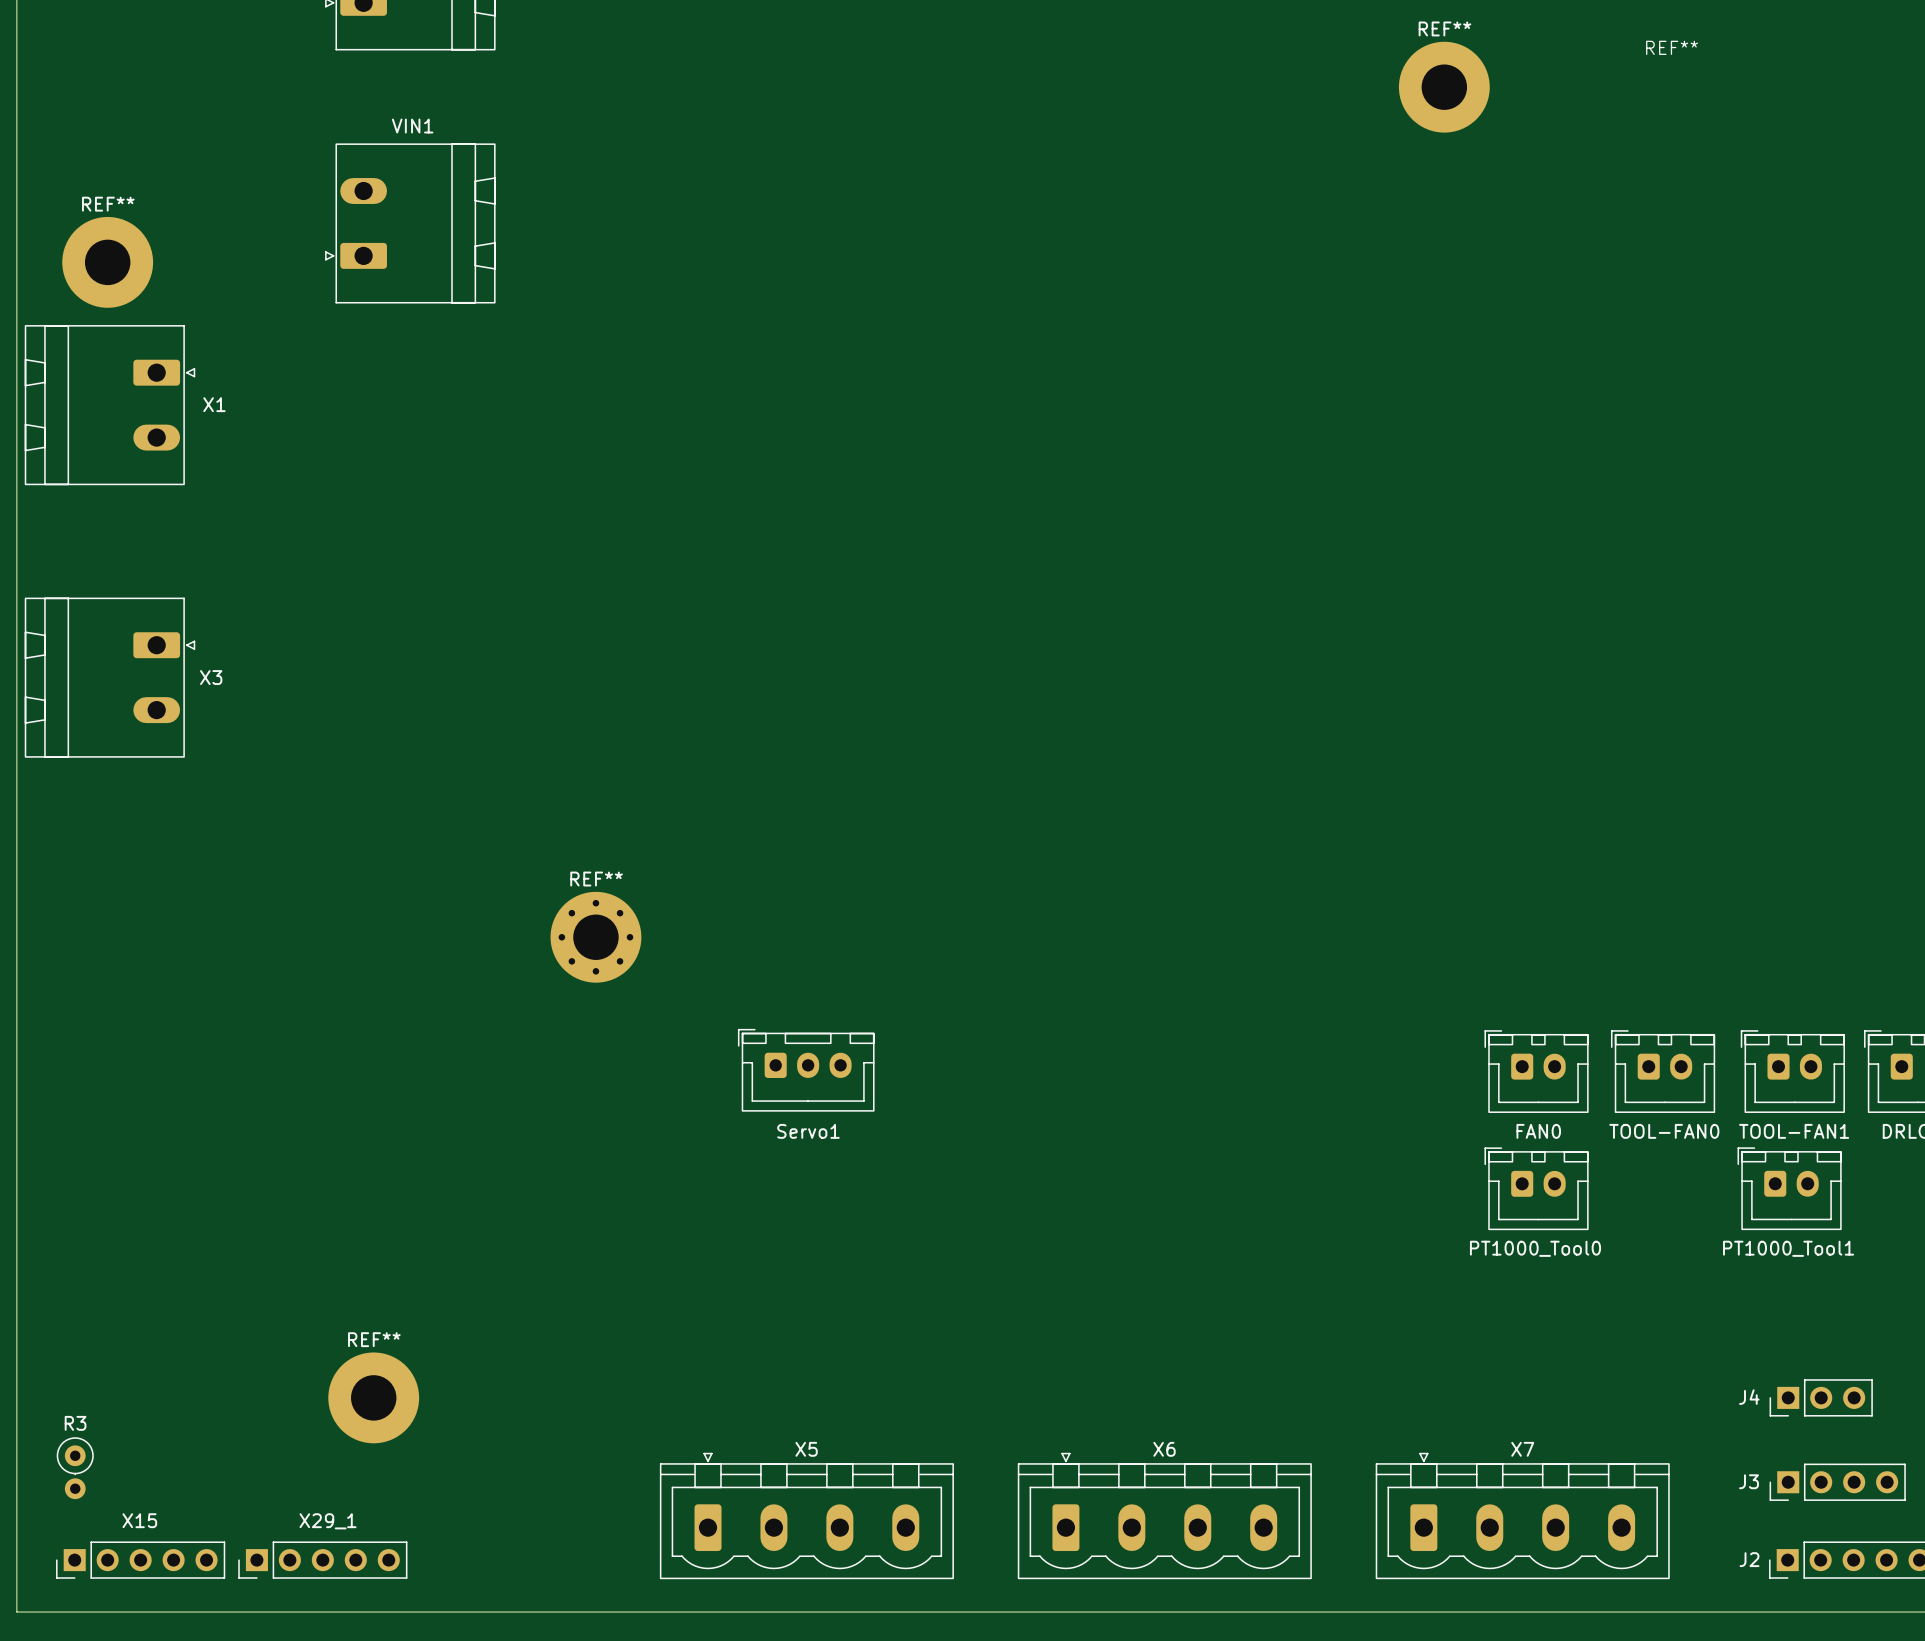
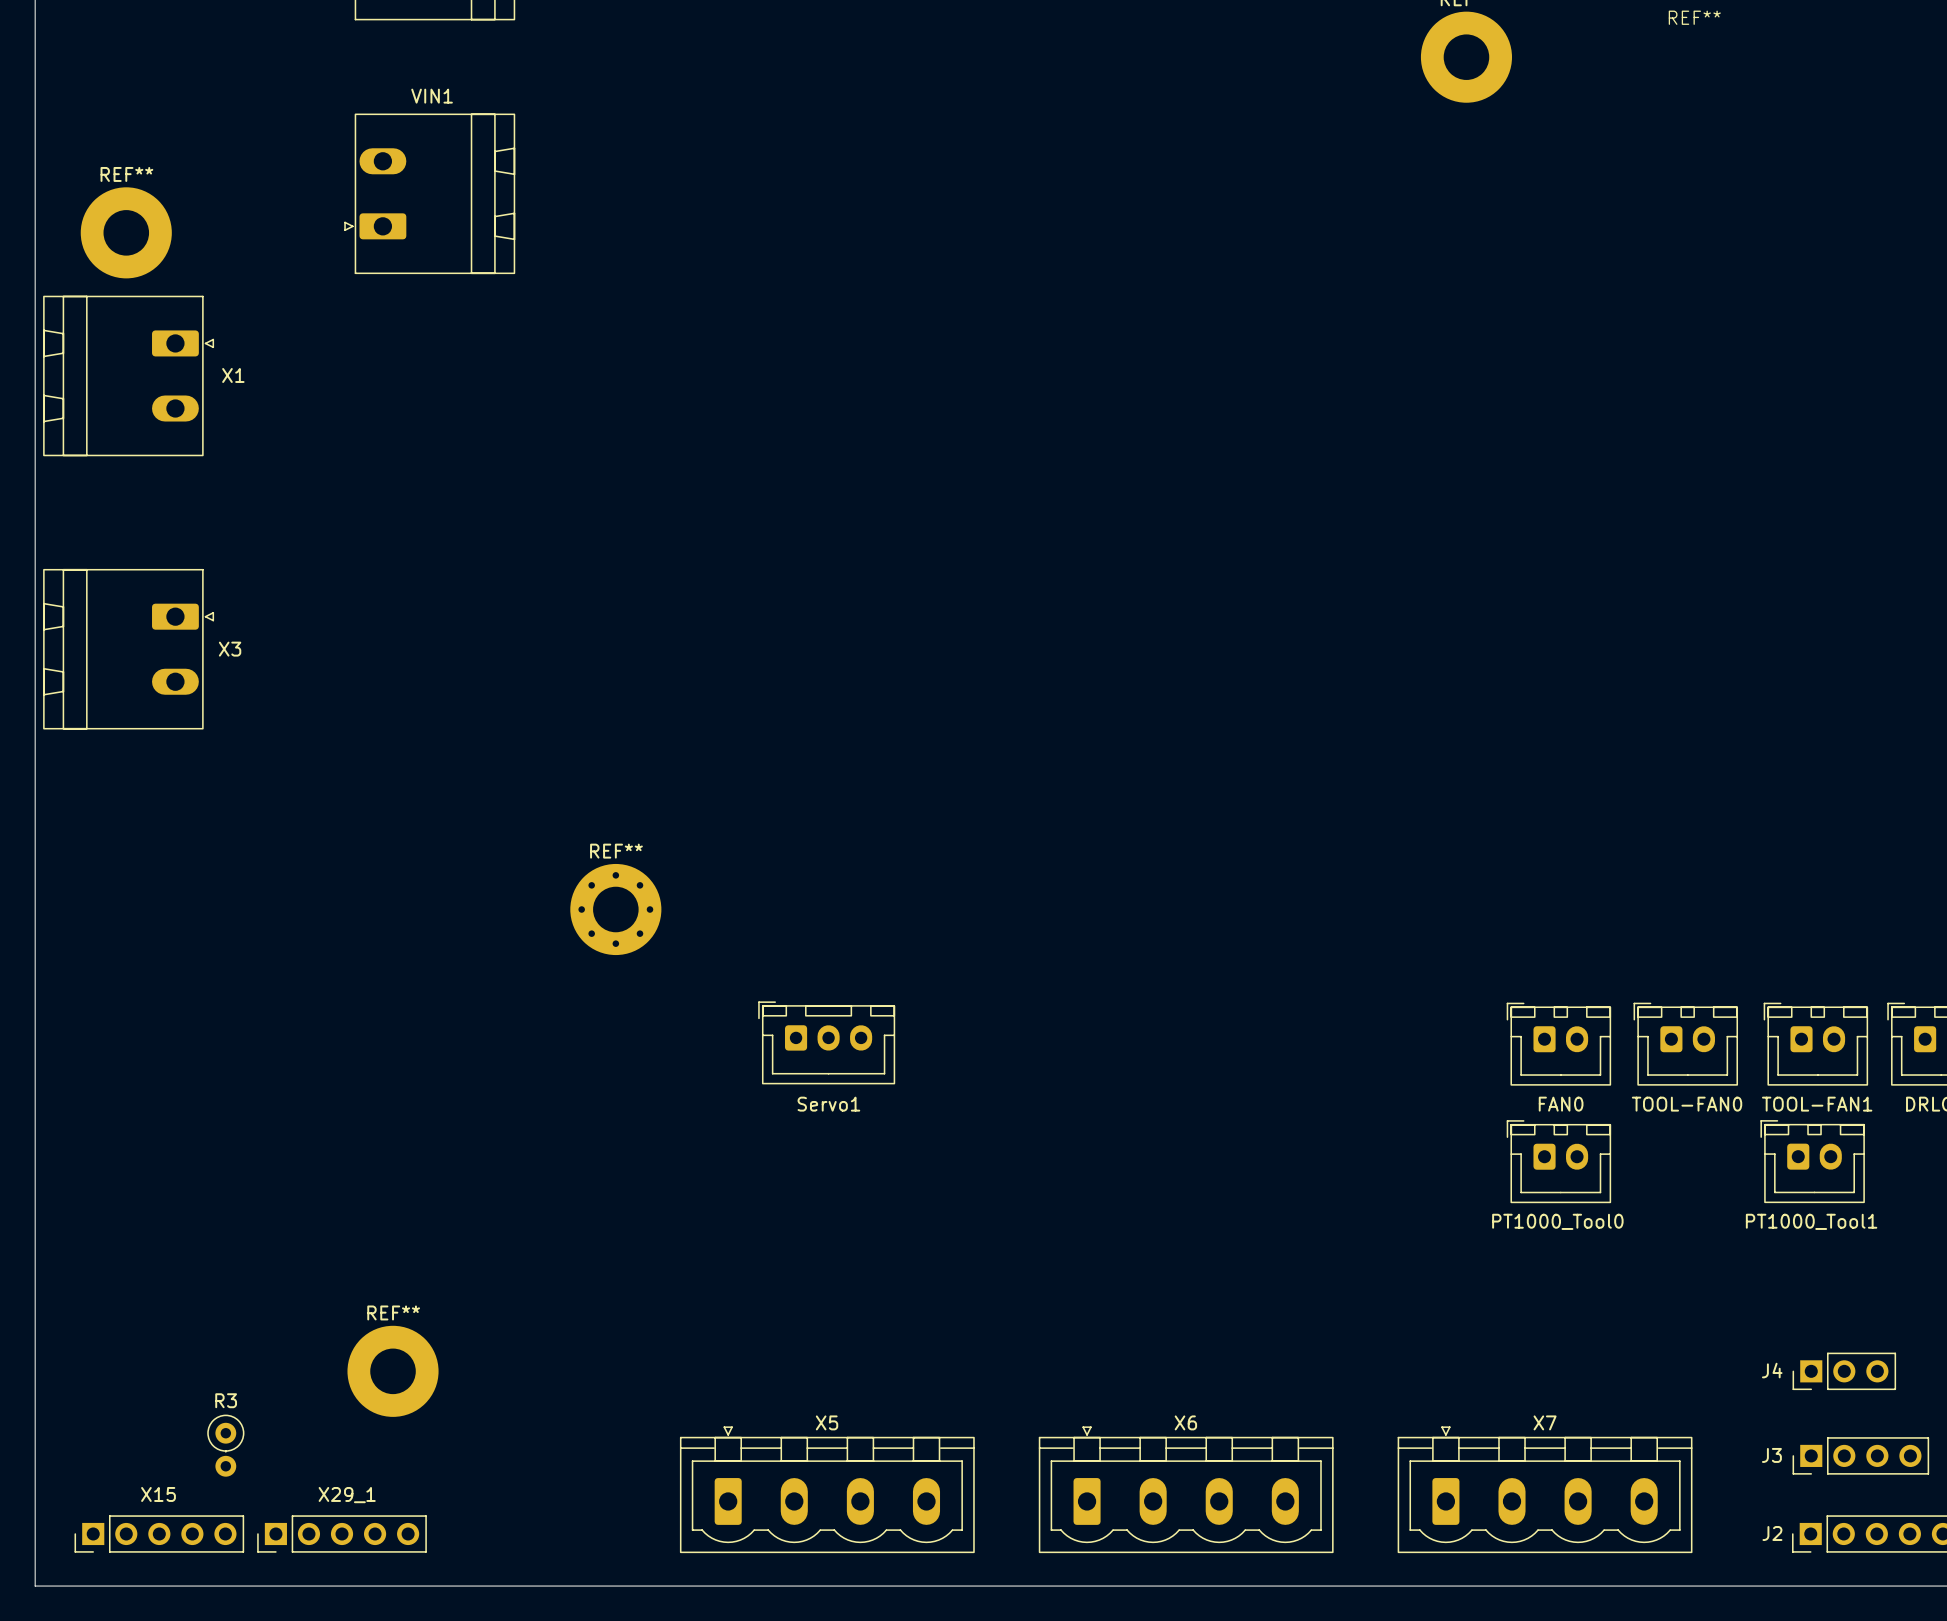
R3 position: (75, 1468) -> (225, 1445)

